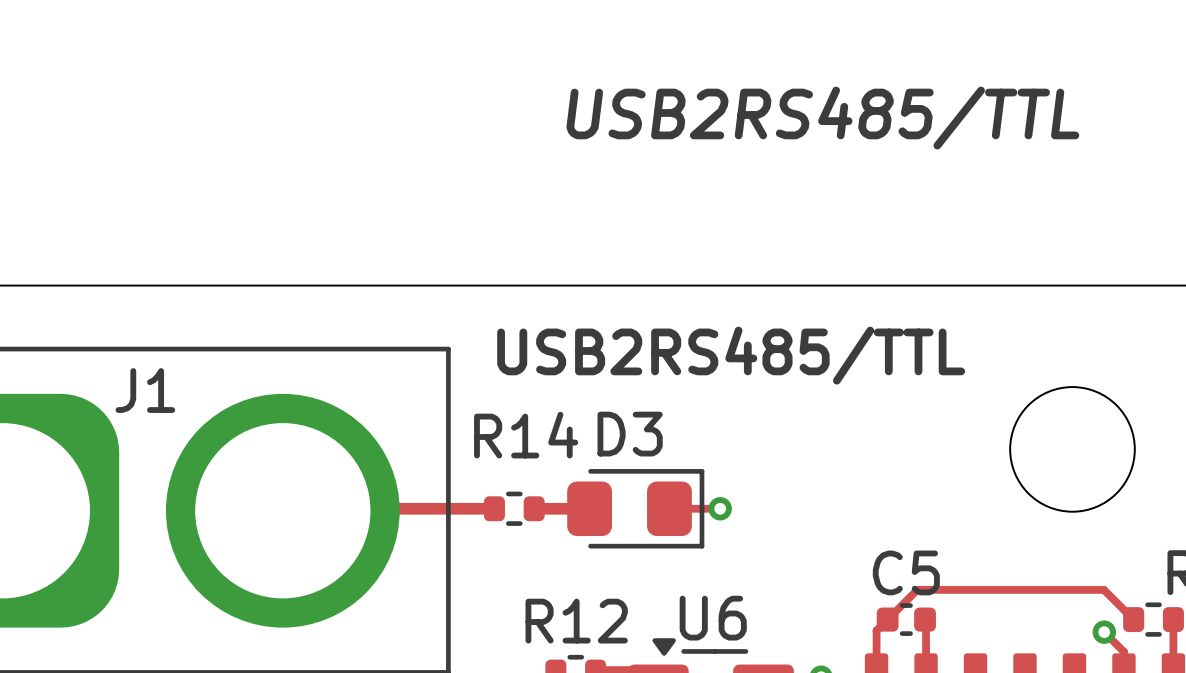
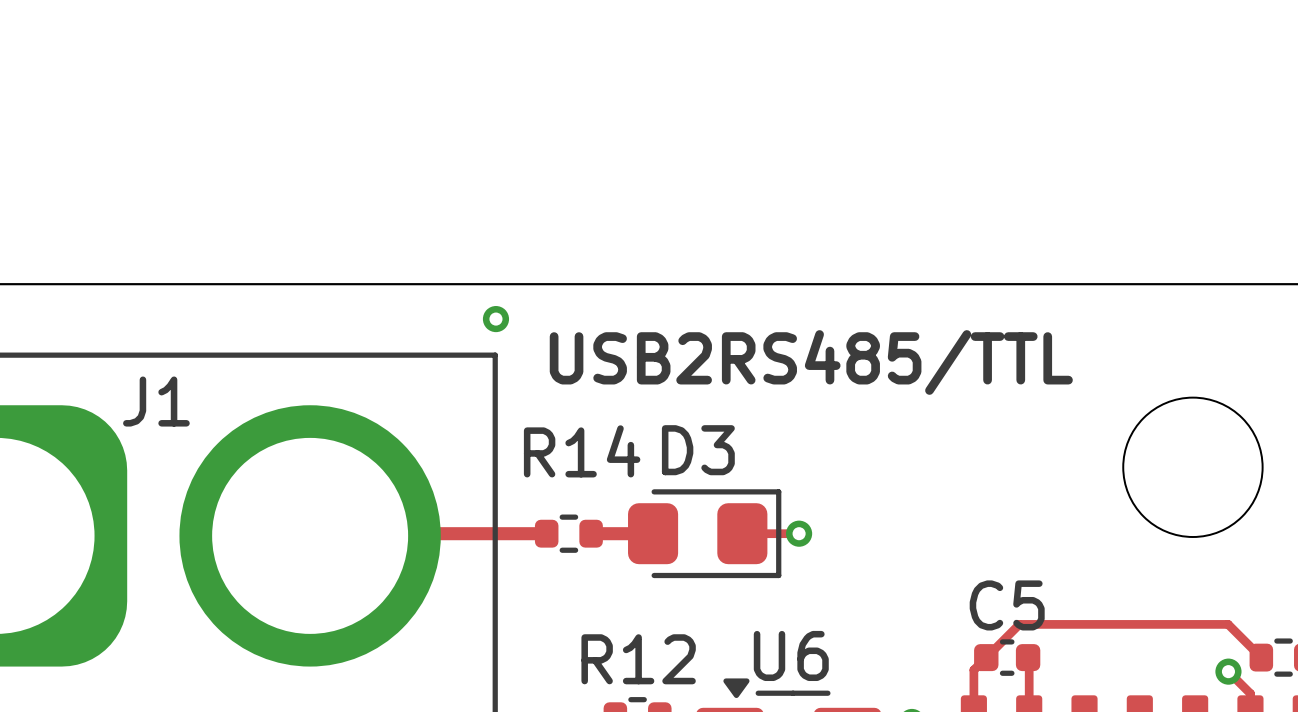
text: USB2RS485/TTL (822, 118) -> none
via: none -> (495, 319)

